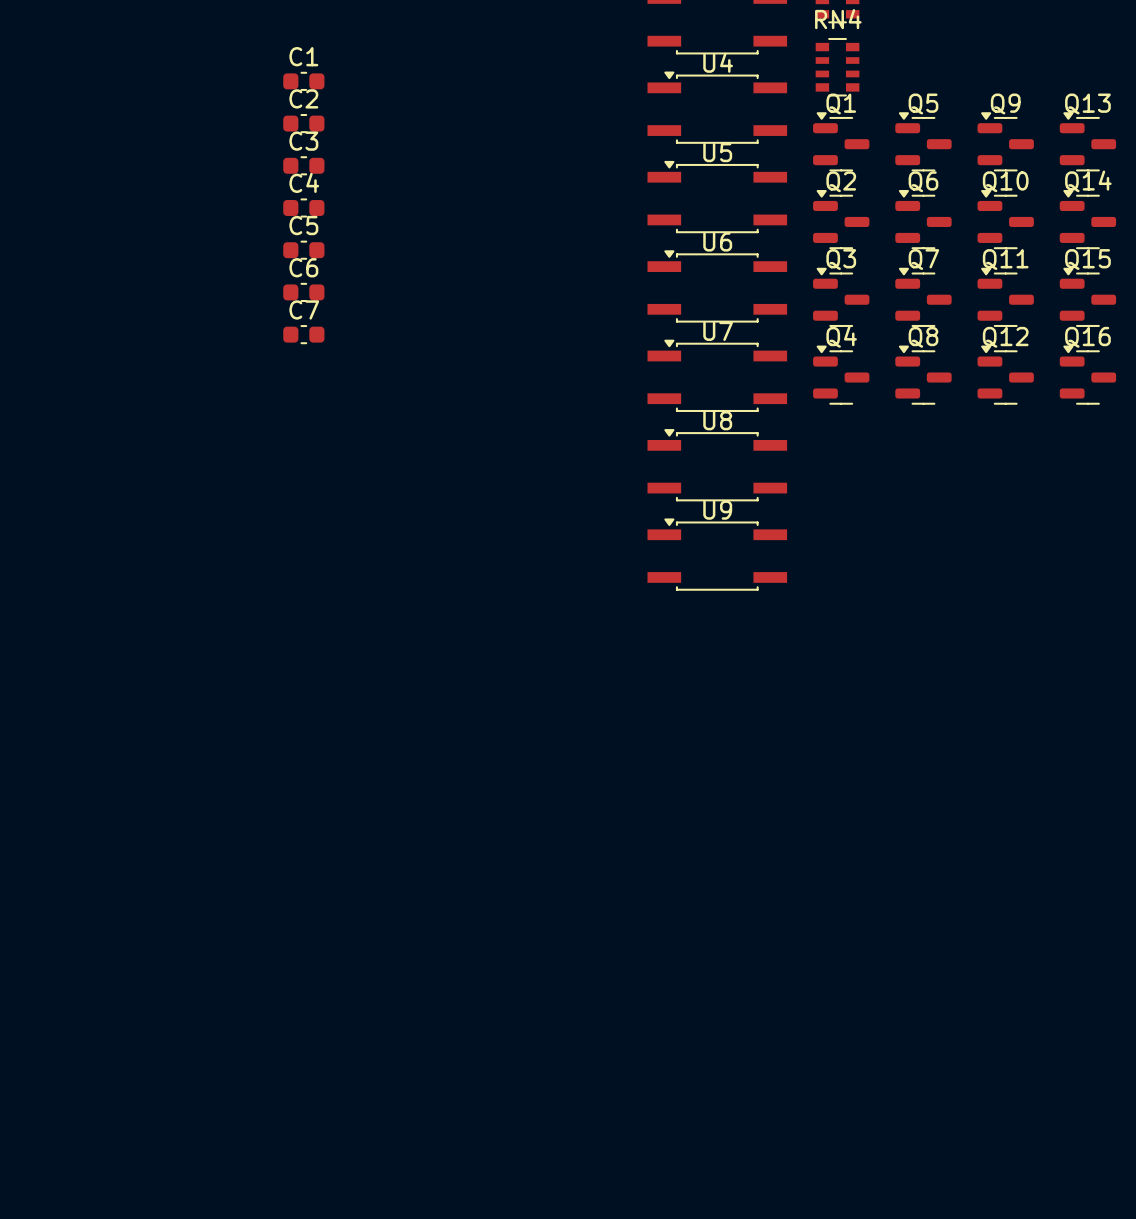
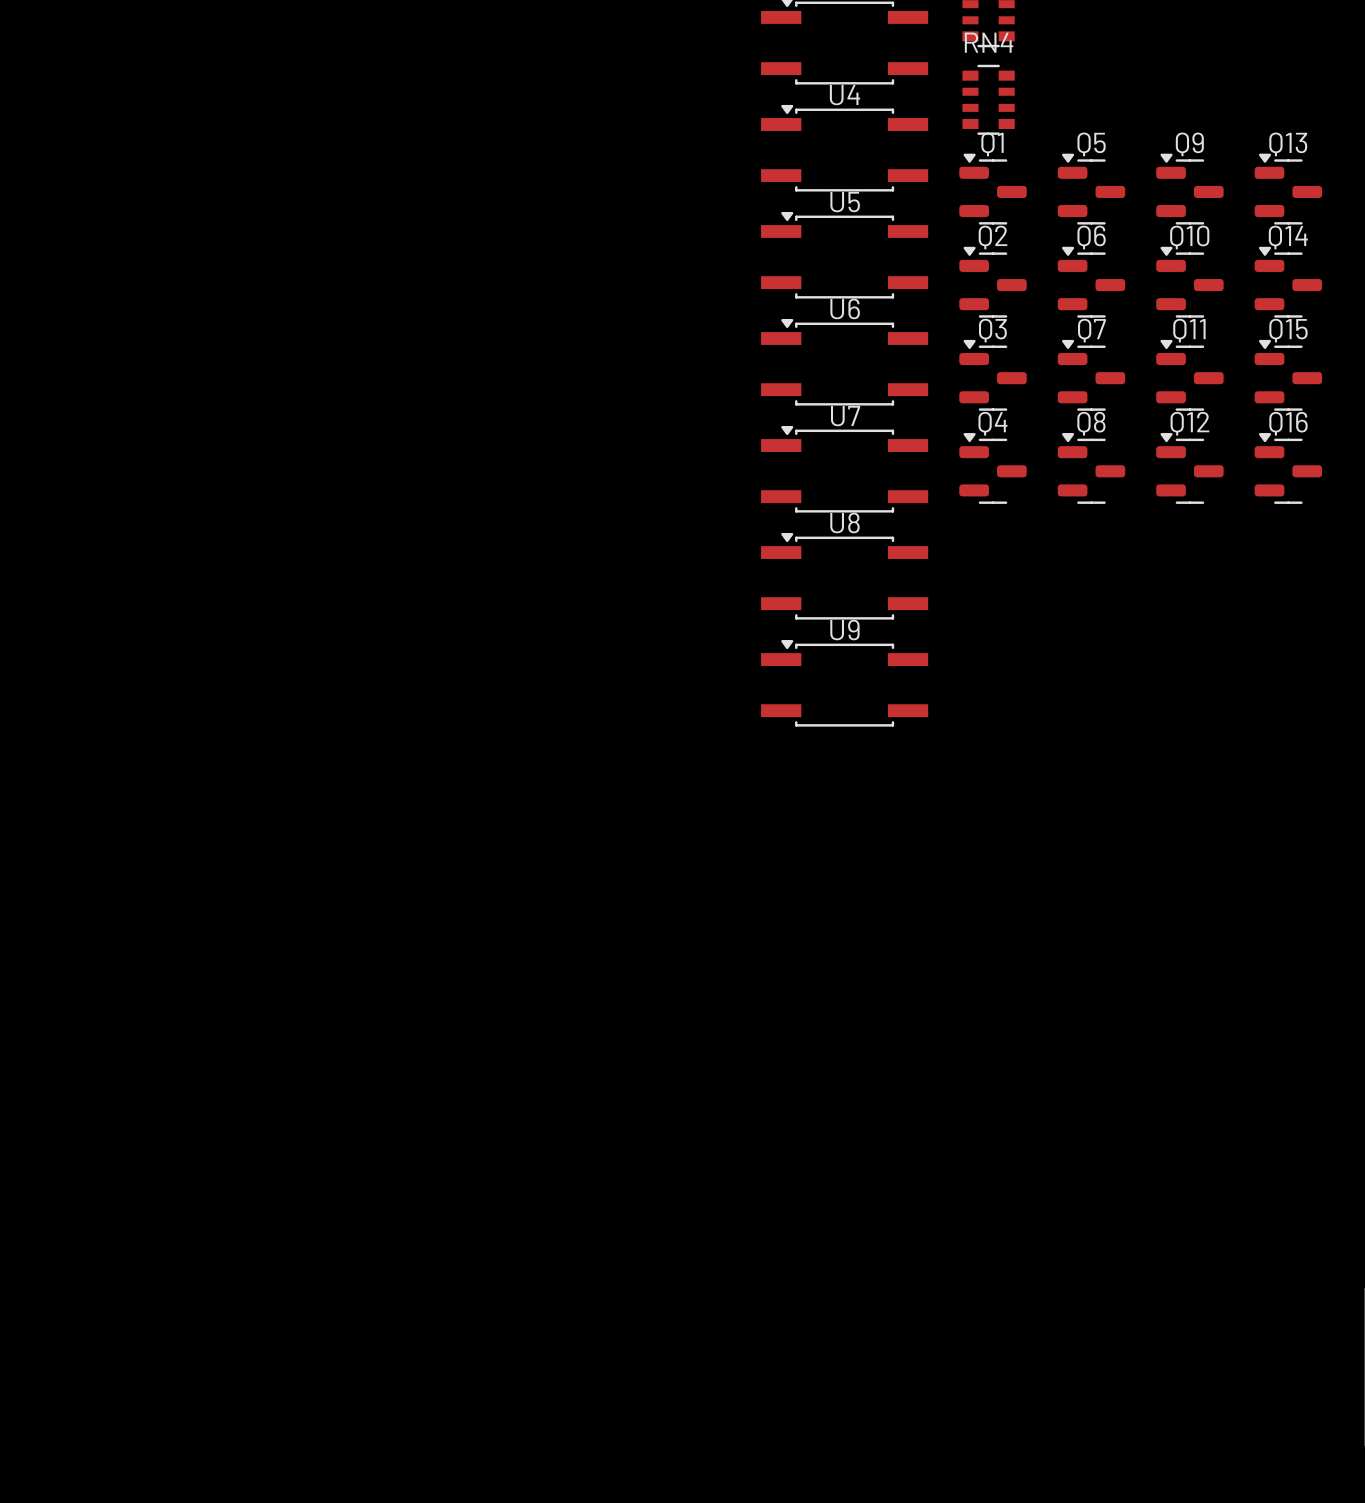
C1: (303, 81) -> none
C2: (303, 123) -> none
C3: (303, 165) -> none
C4: (303, 208) -> none
C5: (303, 250) -> none
C6: (303, 292) -> none
C7: (303, 334) -> none

